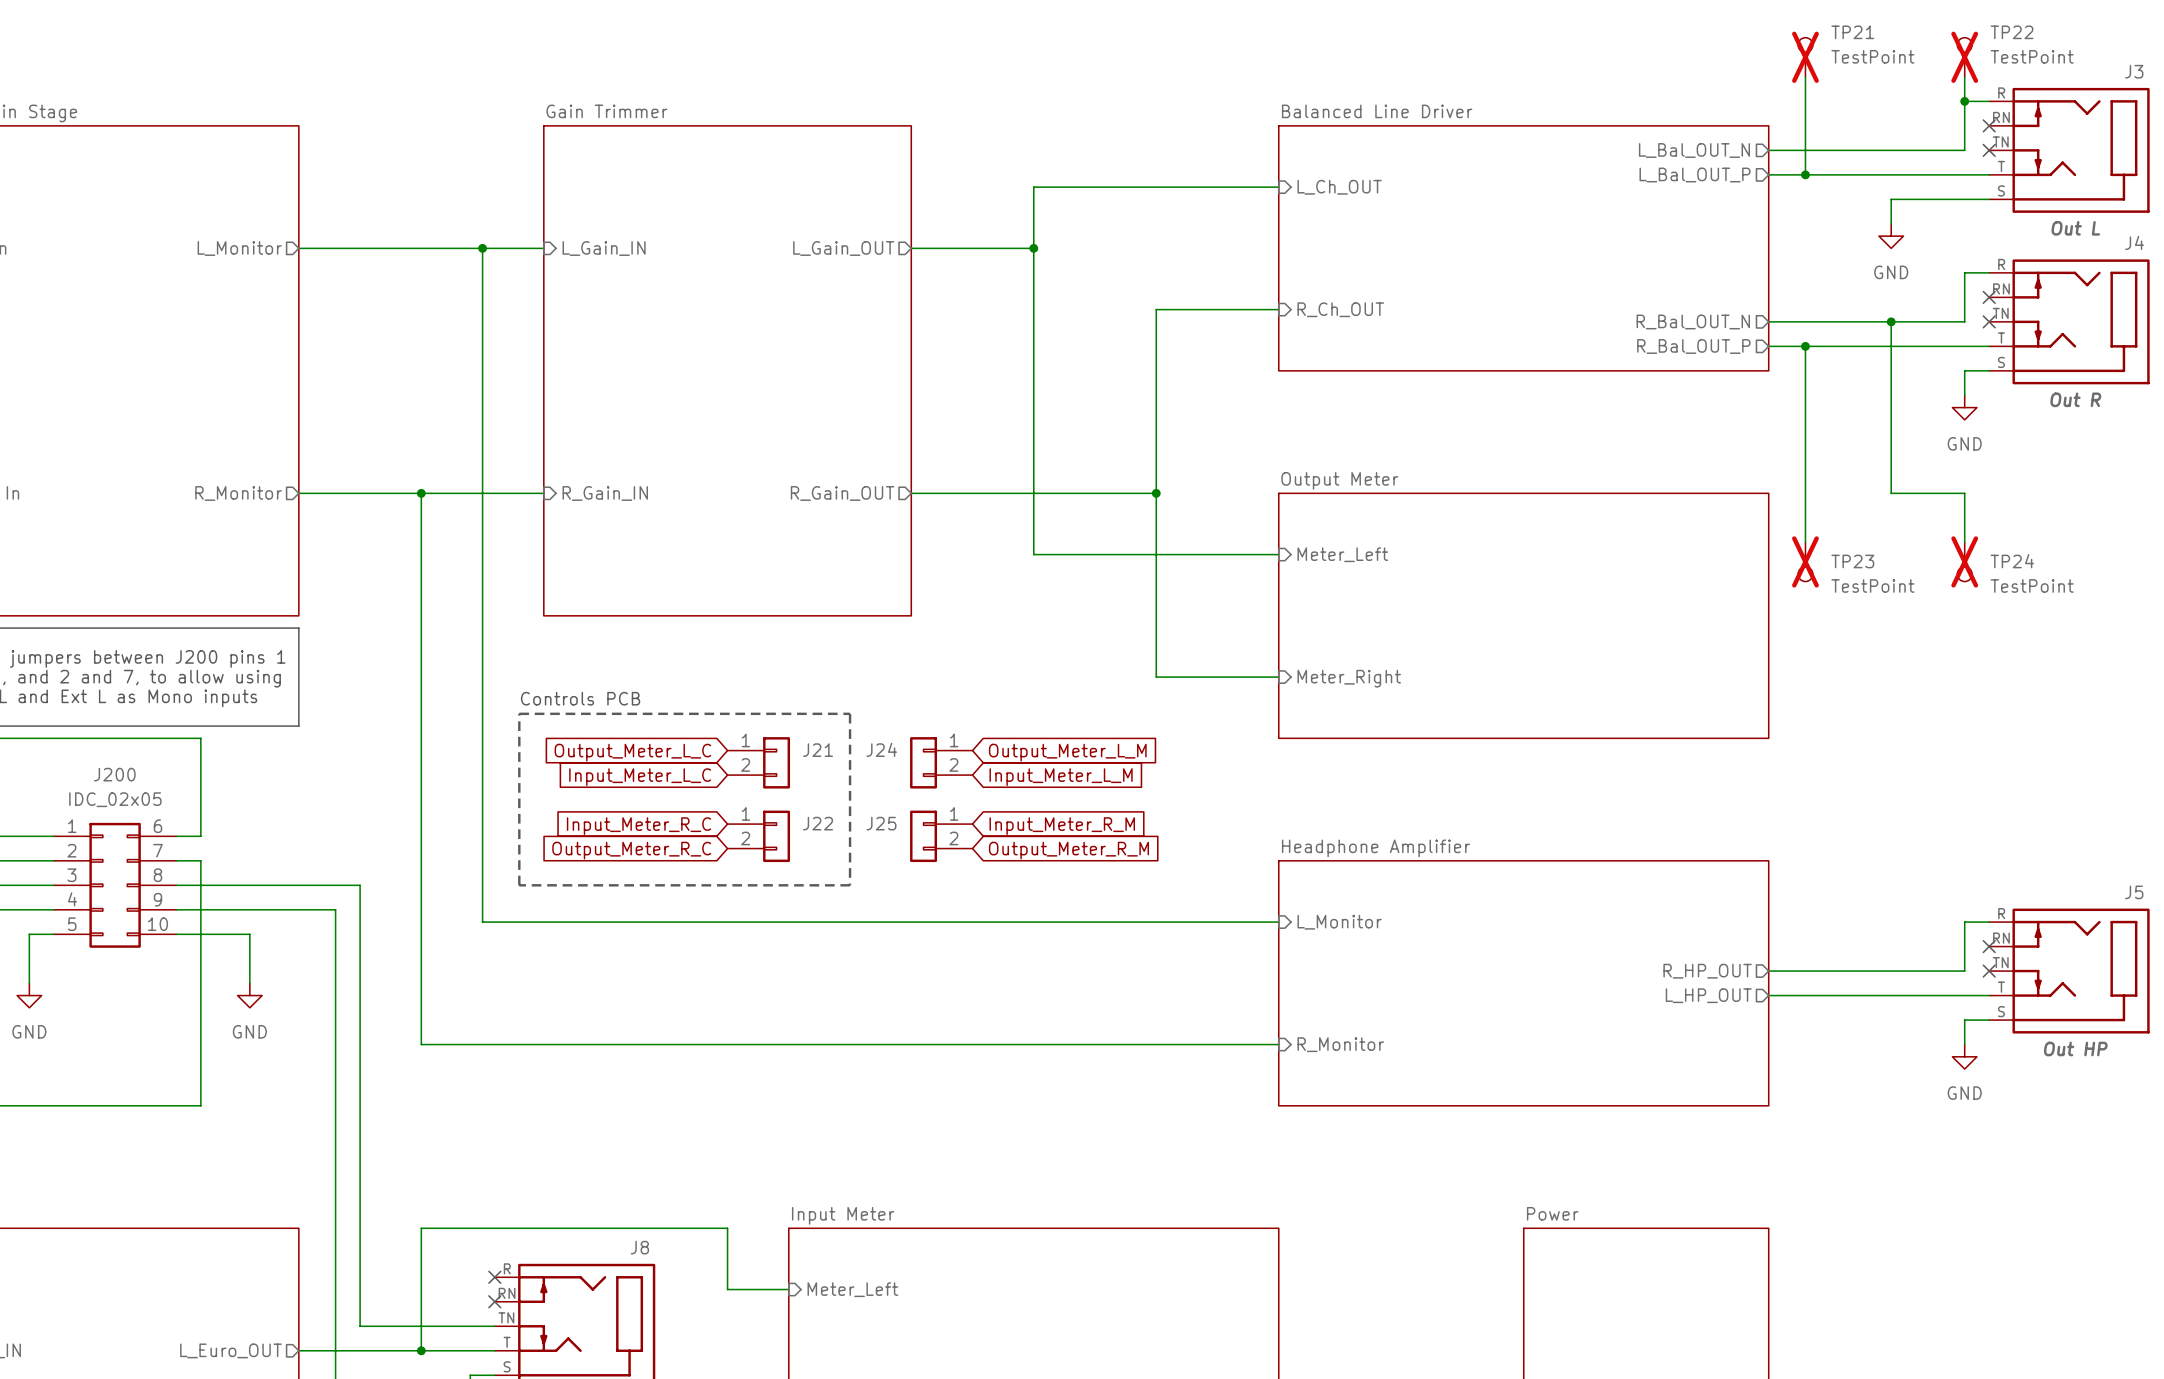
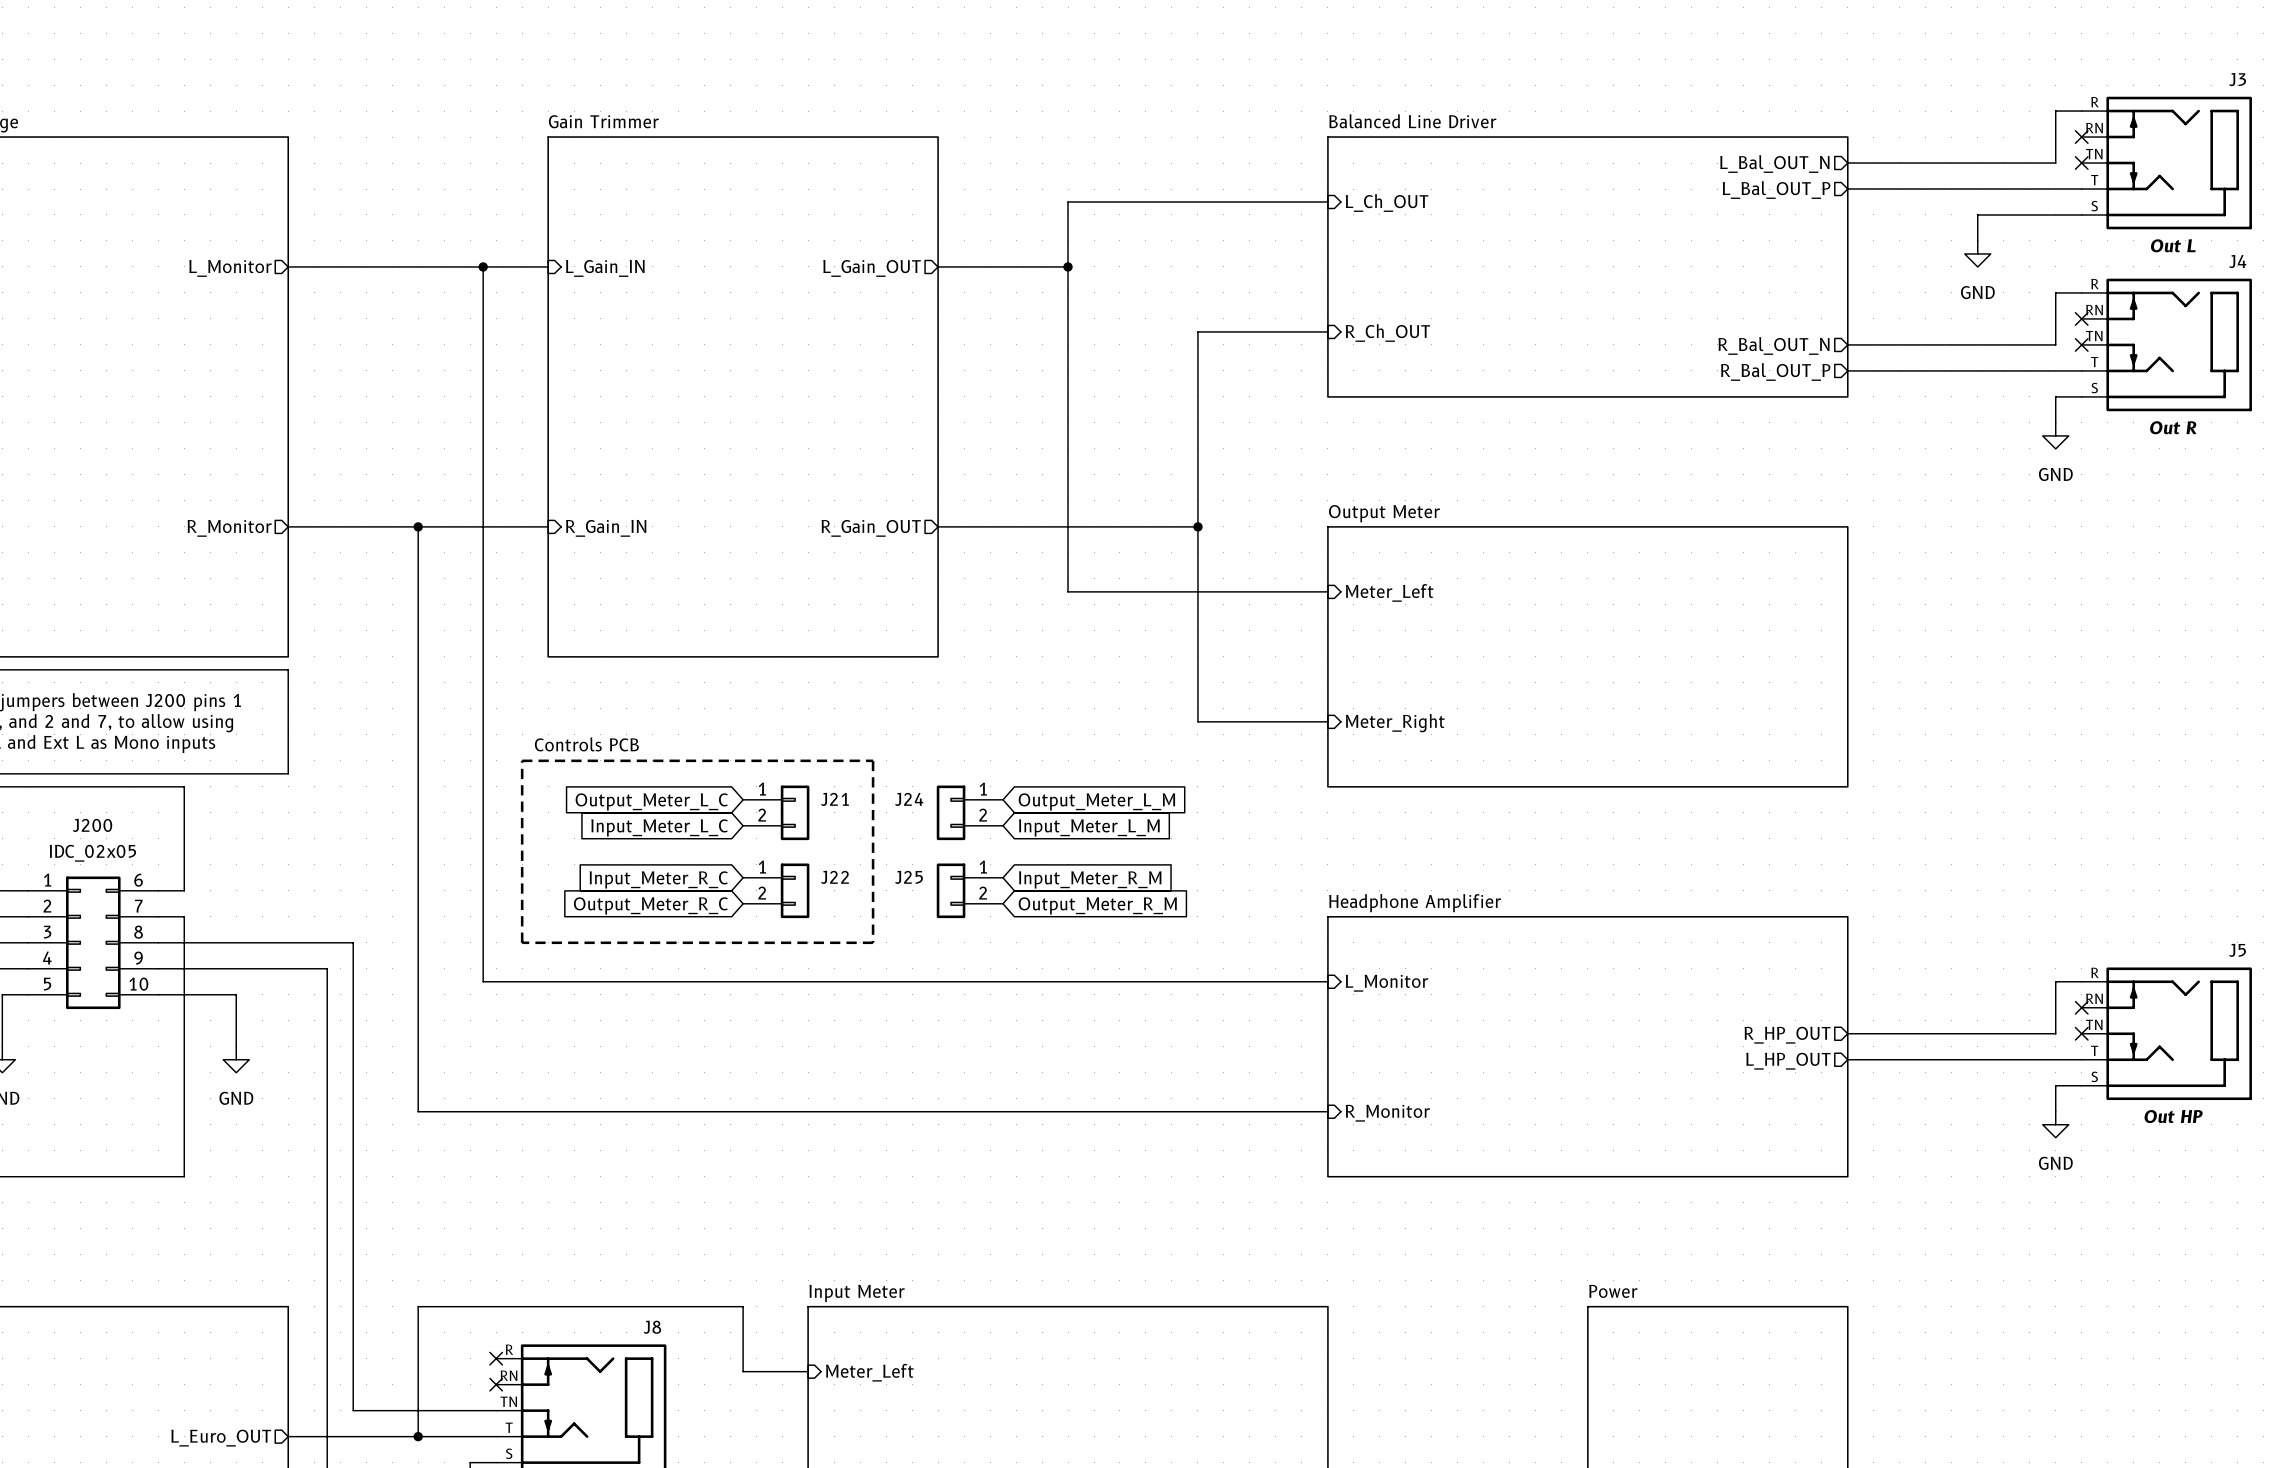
TP21: TestPoint (1805, 57) -> none
TP22: TestPoint (1964, 57) -> none
wire: (1805, 76) (1805, 174) -> none
wire: (1964, 76) (1964, 101) -> none
junction: (1964, 101) -> none
junction: (1805, 174) -> none
wire: (1891, 321) (1891, 493) (1964, 493) (1964, 542) -> none
junction: (1891, 321) -> none
wire: (1805, 346) (1805, 542) -> none
junction: (1805, 346) -> none
TP23: TestPoint (1805, 561) -> none
TP24: TestPoint (1964, 561) -> none

